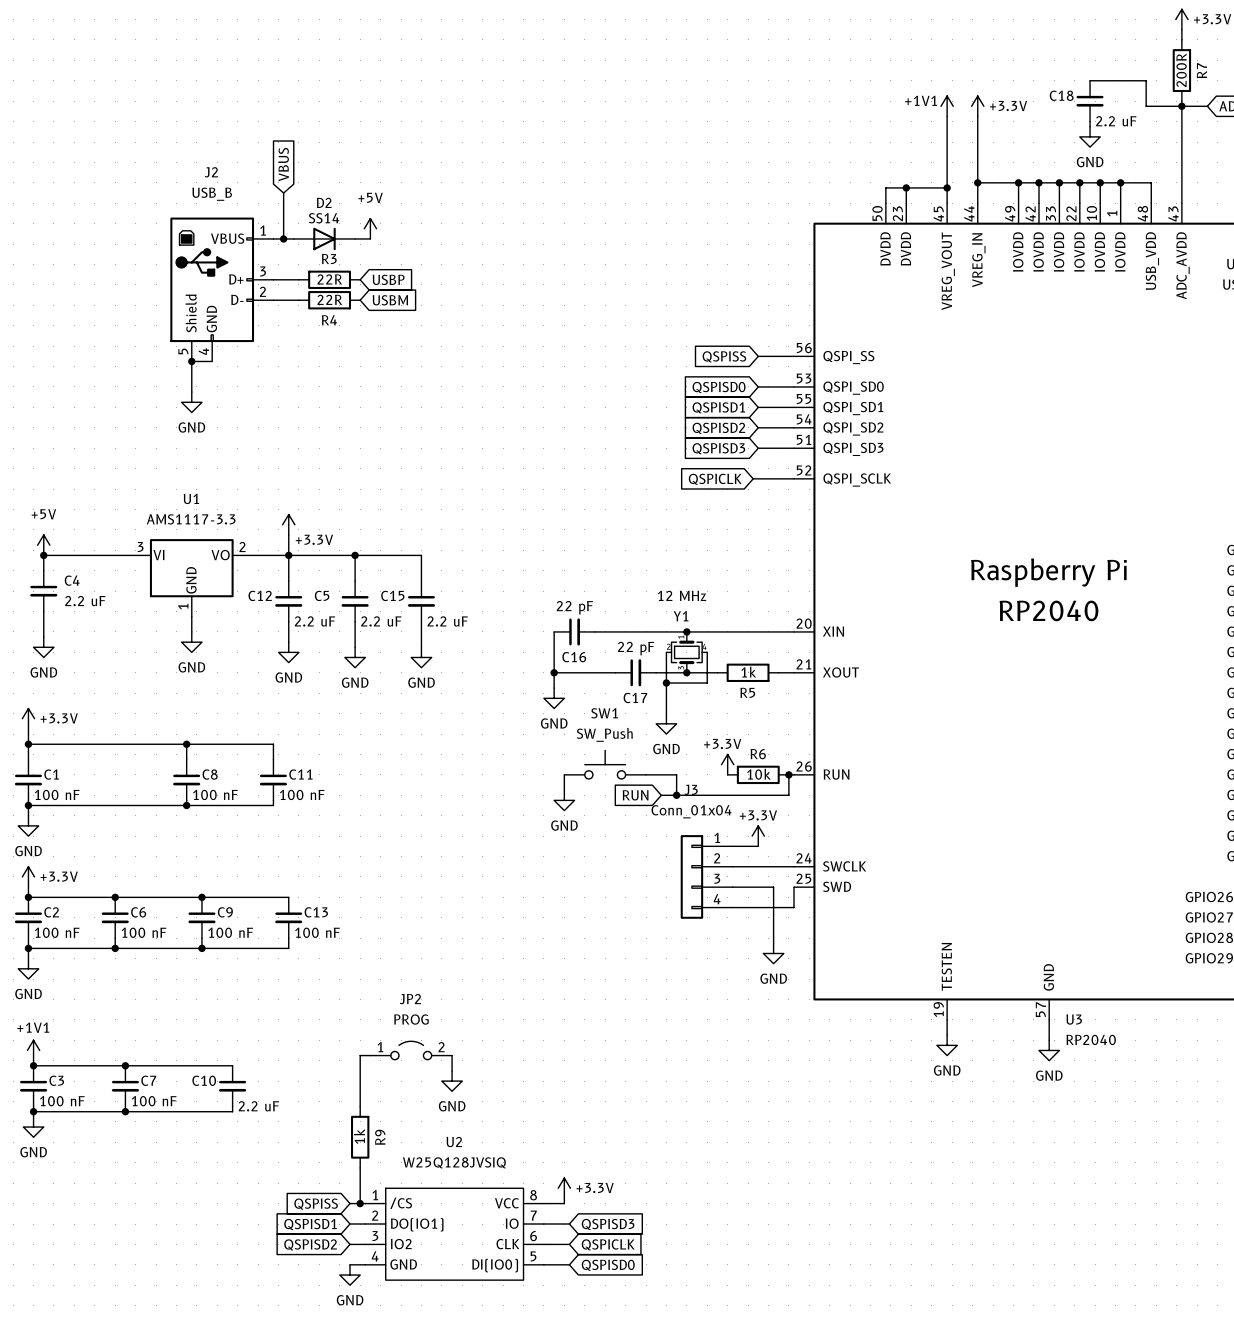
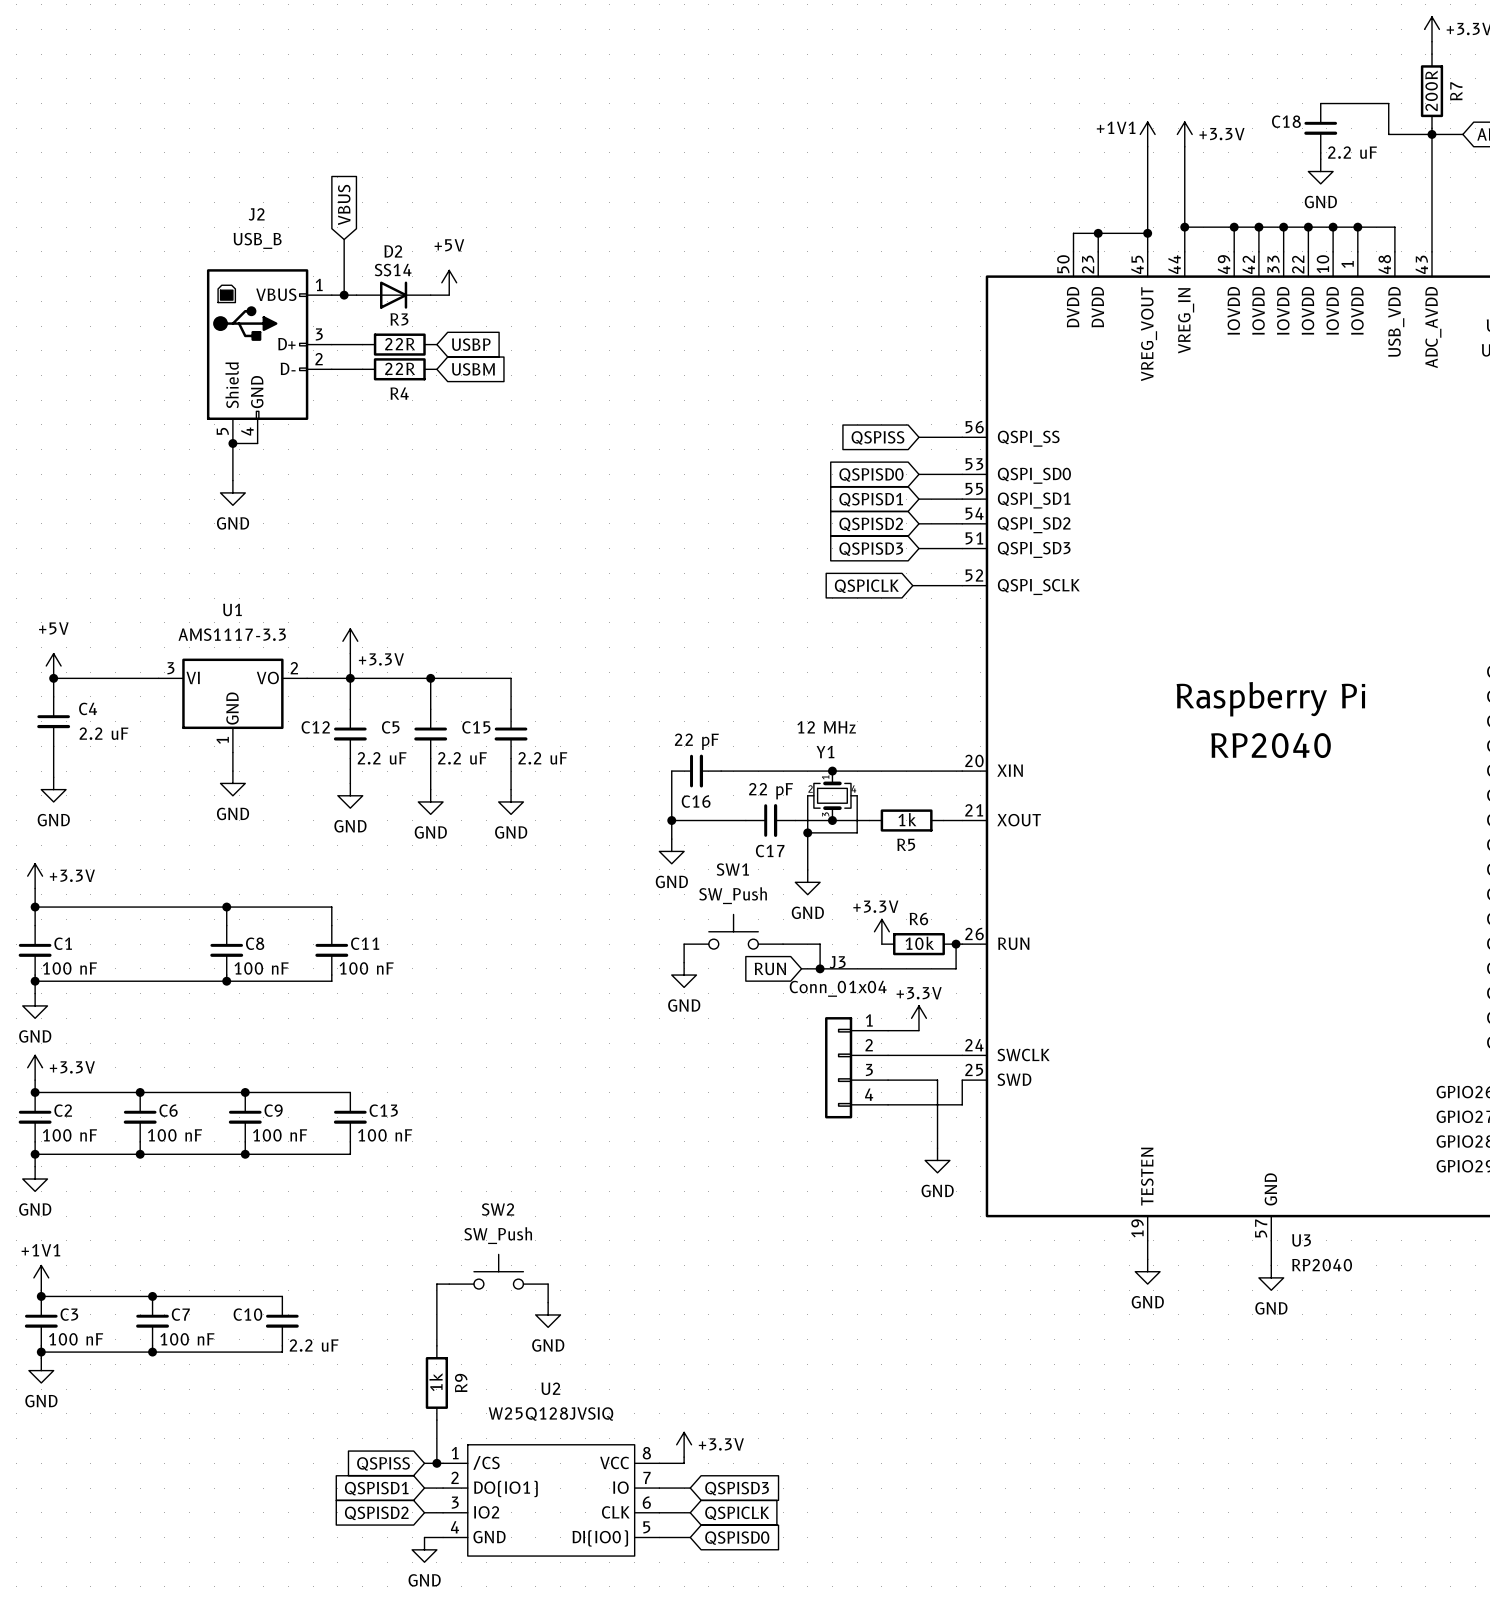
SW2: none -> SW_Push (498, 1271)
JP2: PROG (411, 1050) -> none

